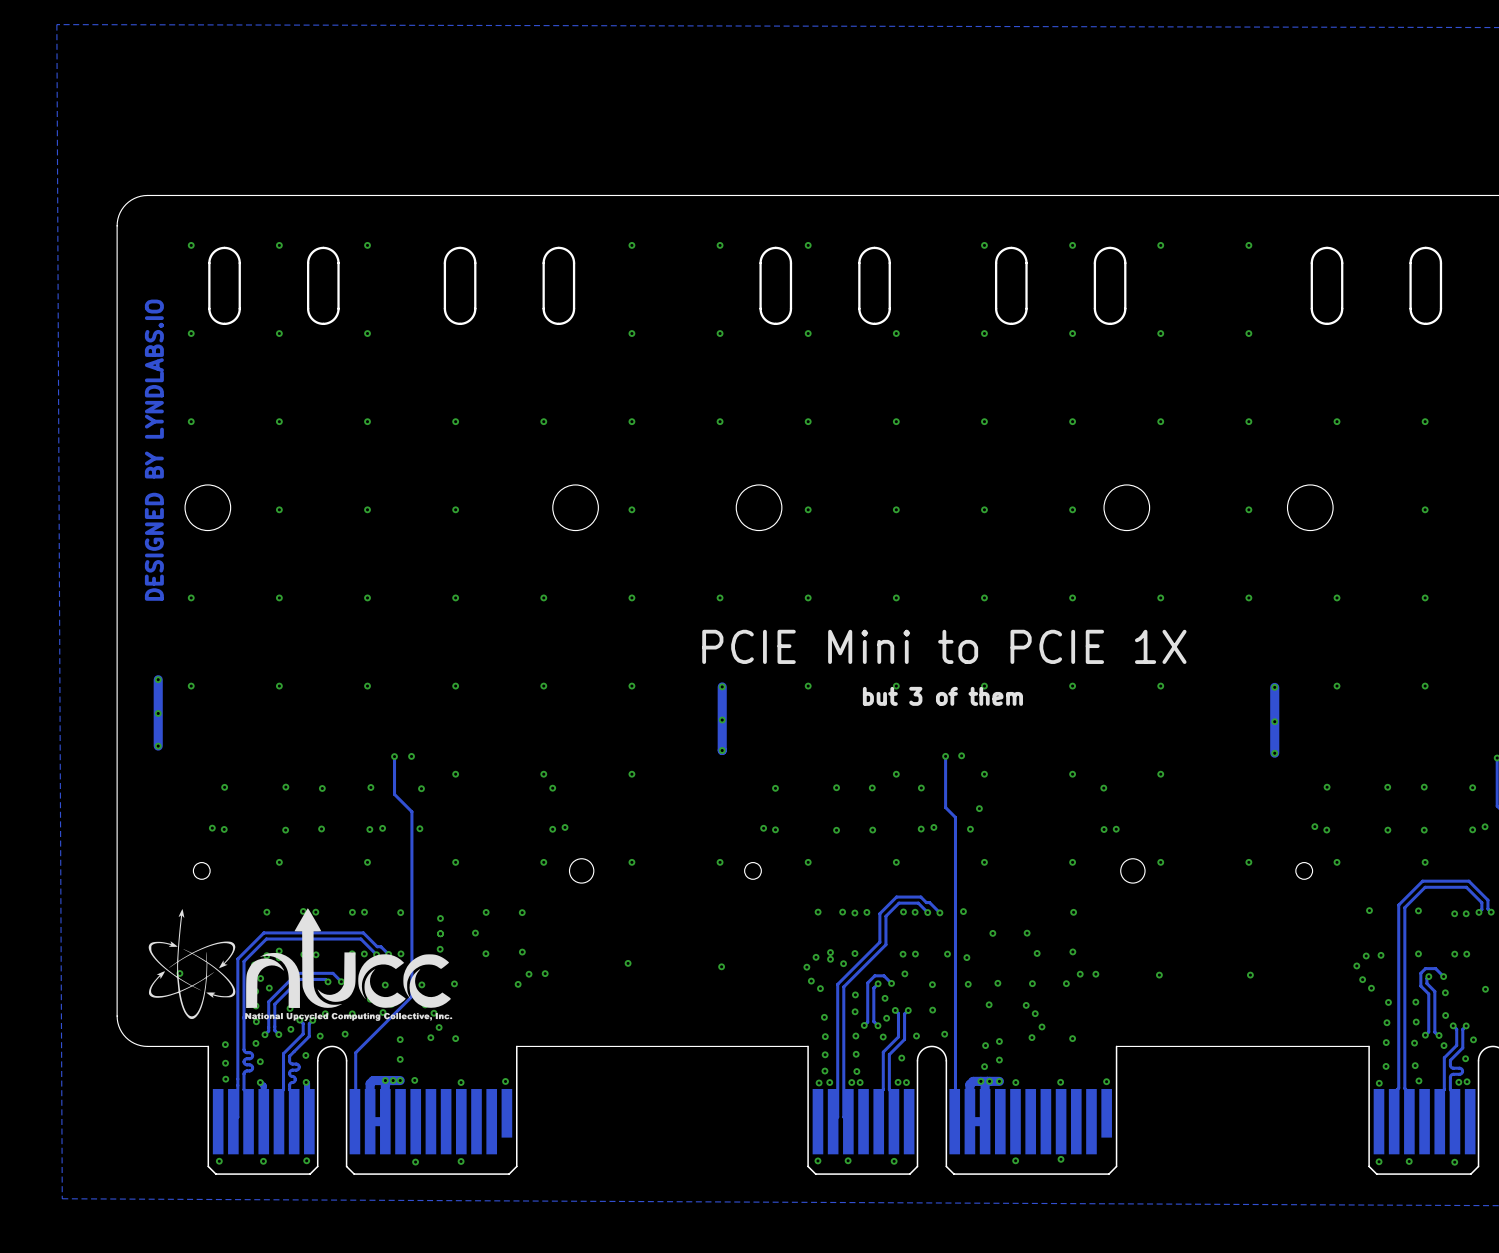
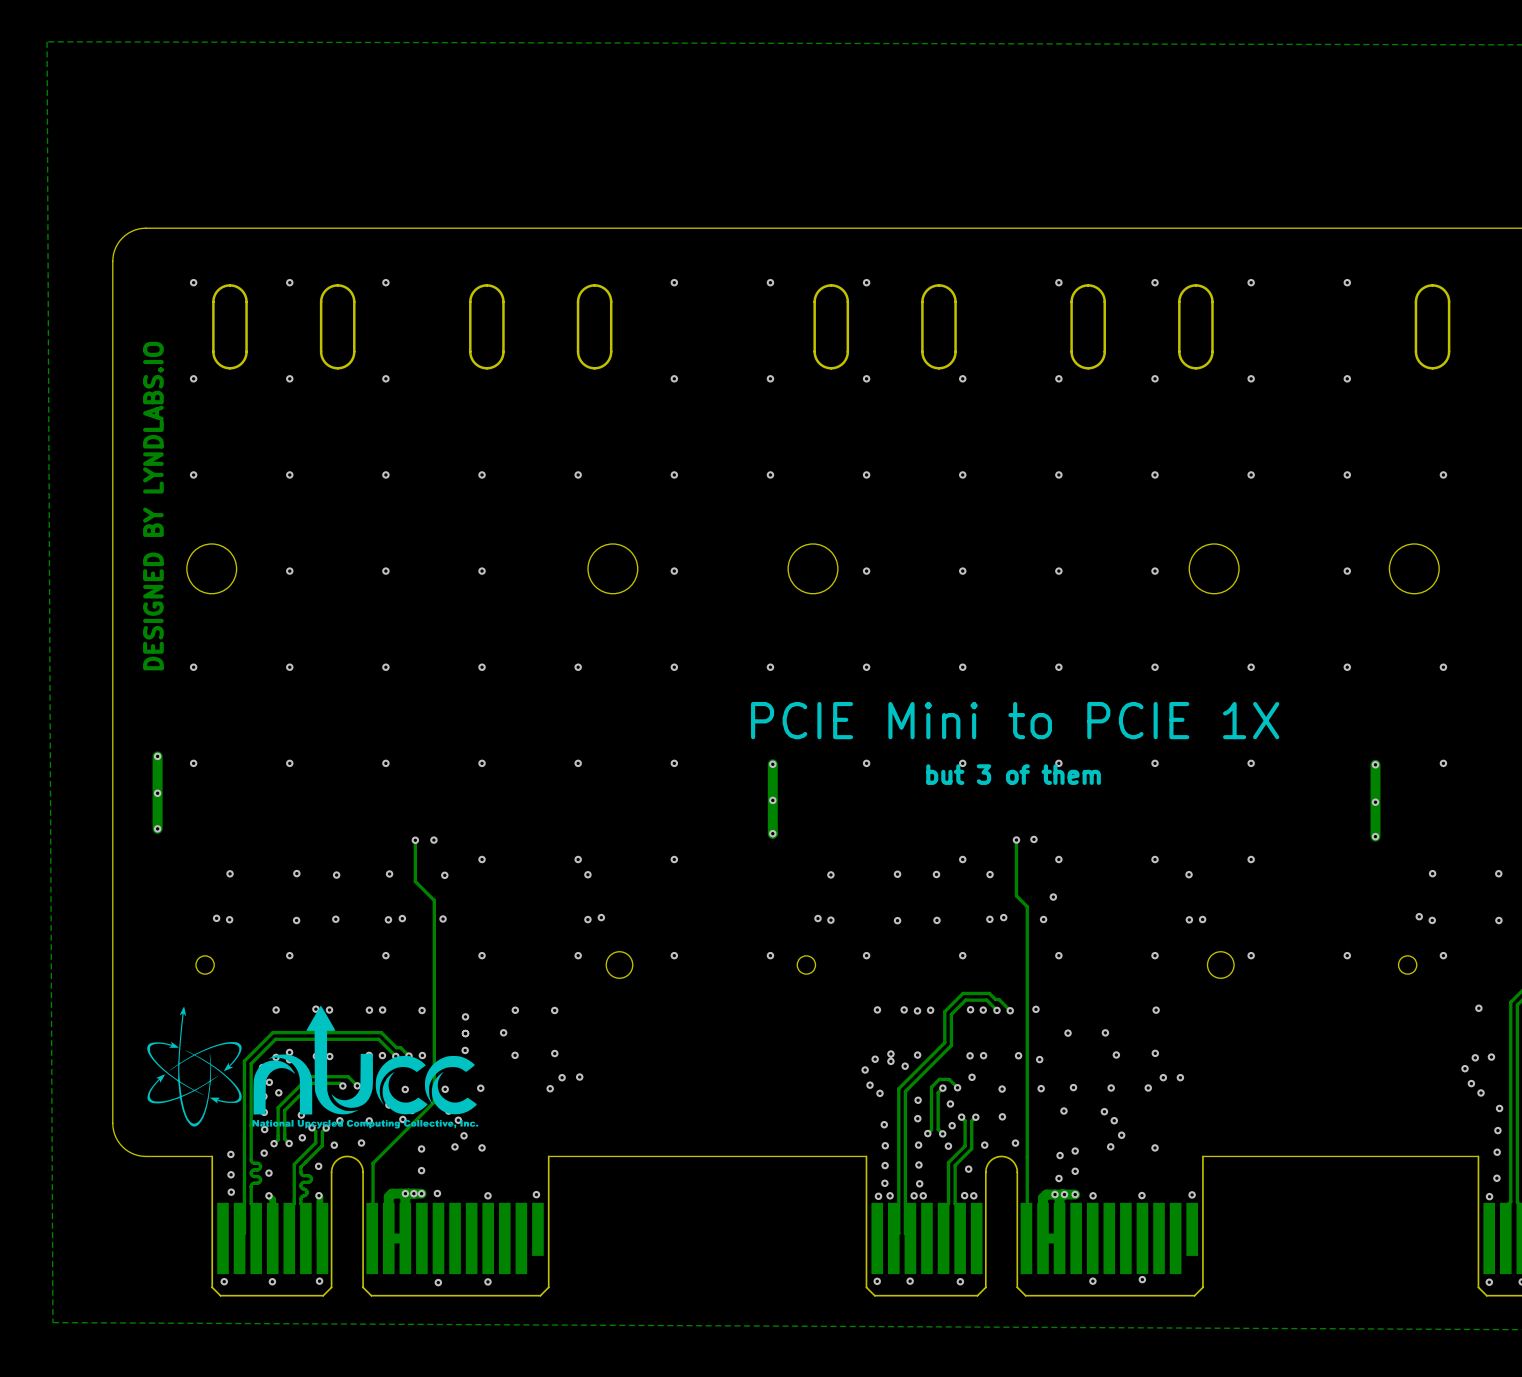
via: (628, 963) -> none
via: (721, 966) -> none
via: (179, 973) -> none
via: (1159, 975) -> none
via: (1250, 975) -> none

